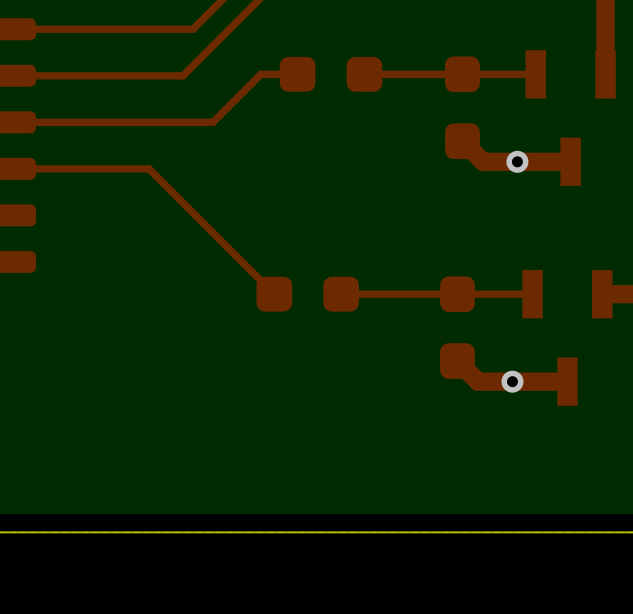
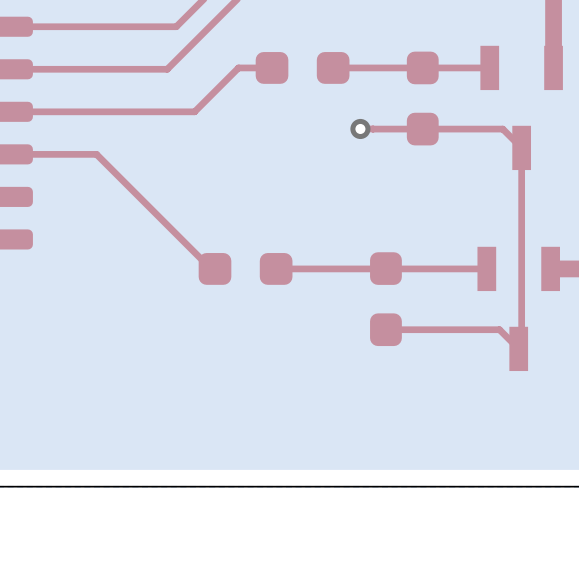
top track: none -> (373, 129) (502, 129) (521, 147) (521, 345) (518, 348) (499, 329) (385, 329)
top track: (462, 141) (483, 161) (570, 161) -> none
via position: (517, 161) -> (360, 128)
top track: (105, 168) (148, 168) (274, 294) -> (96, 154) (211, 268) (215, 268)
part position: (307, 294) -> (245, 268)
top track: none -> (311, 268) (276, 268)
part position: (457, 327) -> (385, 299)
top track: (457, 361) (478, 381) (567, 381) -> none
via: (512, 381) -> none

